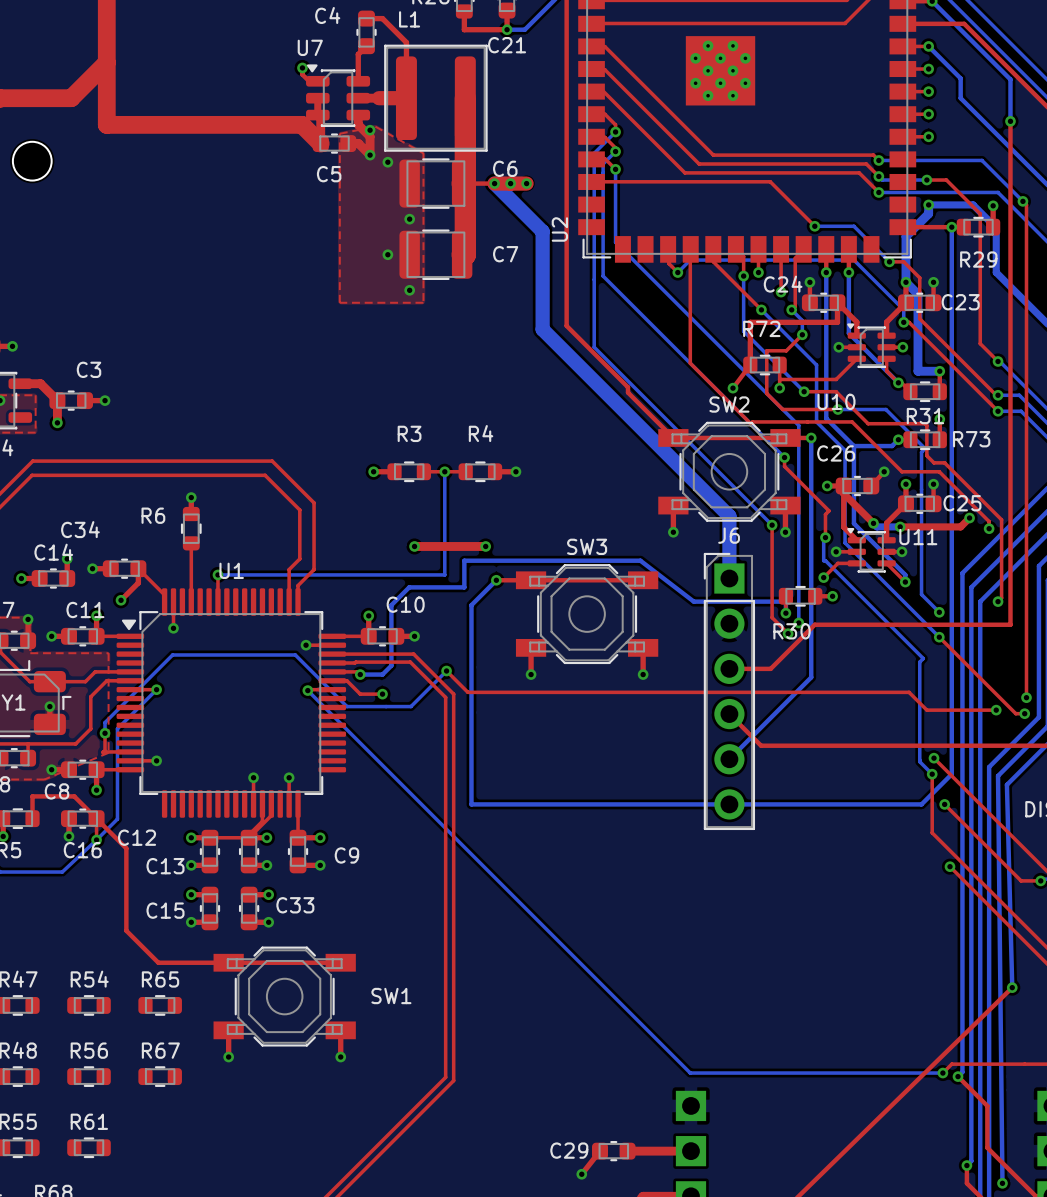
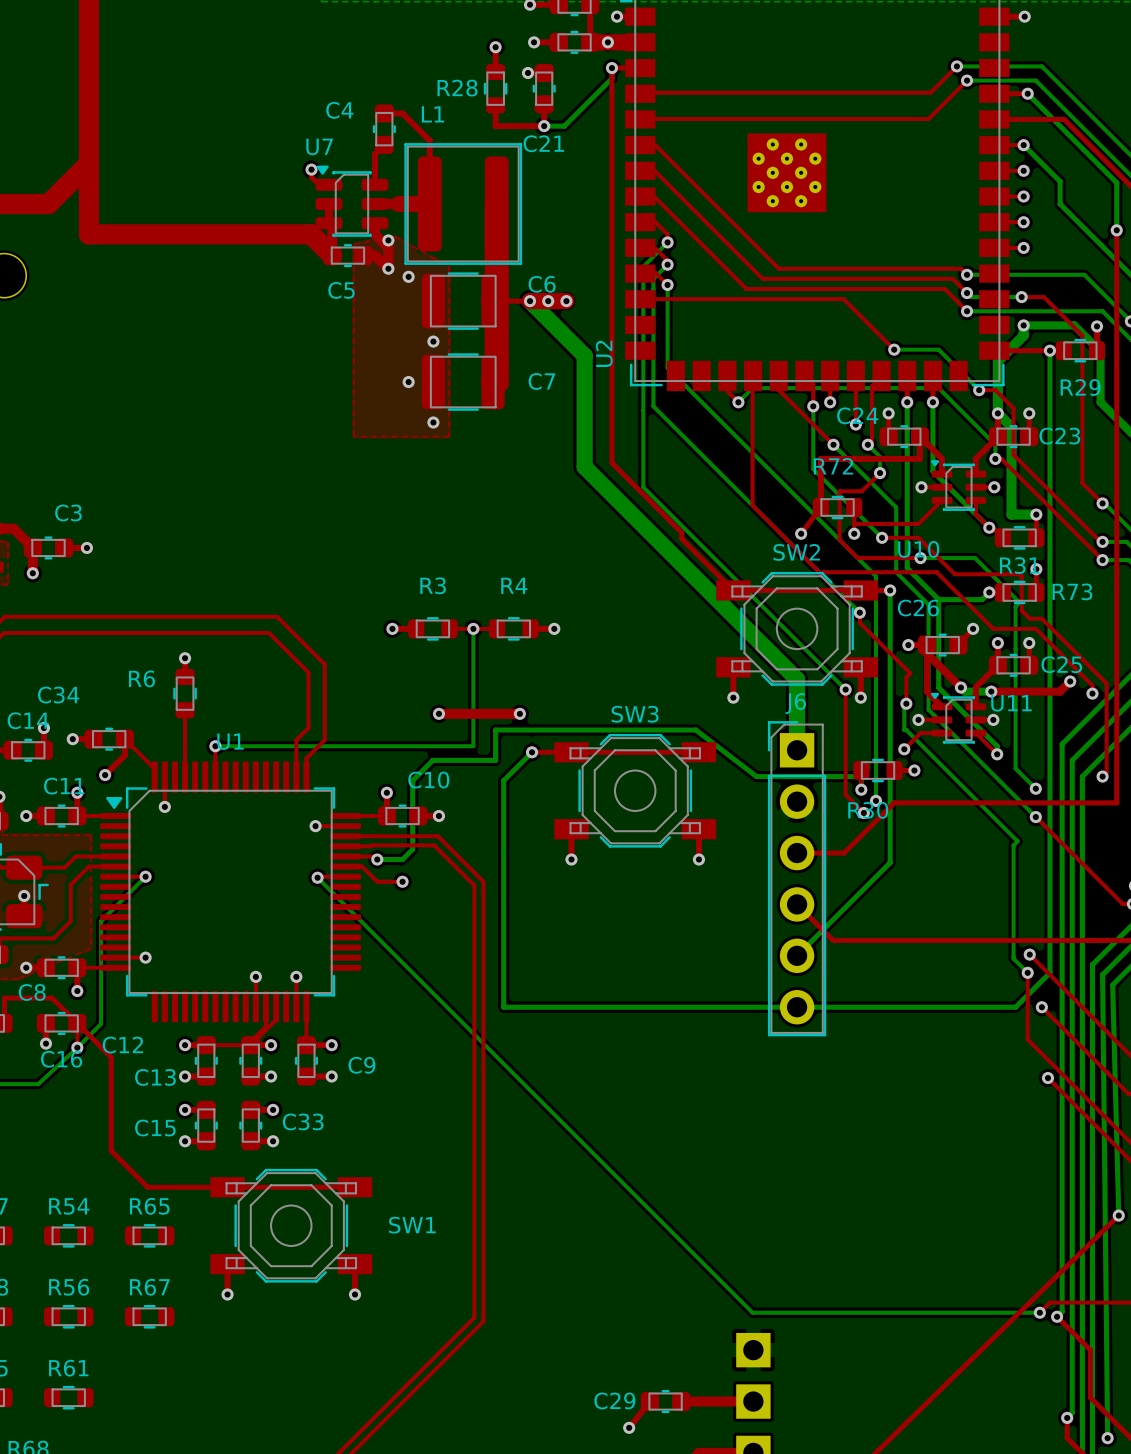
top track: (446, 671) (467, 692) (909, 692) (926, 710) (996, 710) -> none
bottom track: (446, 671) (410, 706) (346, 706) (295, 654) (172, 654) (105, 722) (105, 733) -> none
via: (446, 671) -> none
via: (996, 710) -> none
top track: (105, 733) (105, 751) (103, 752) (130, 751) -> none
via: (105, 733) -> none

